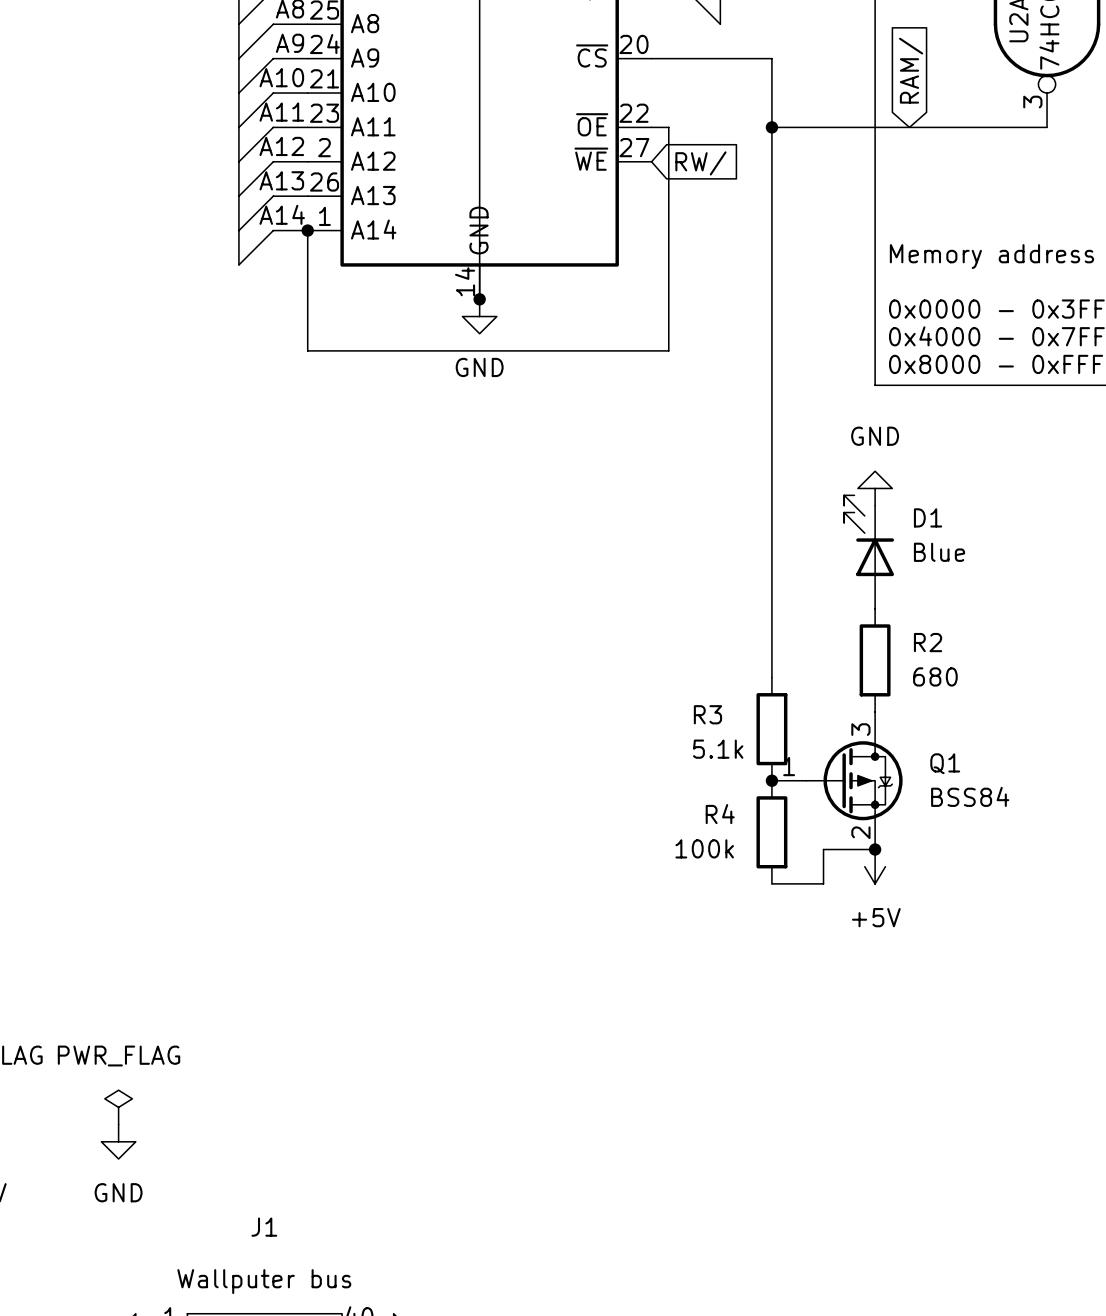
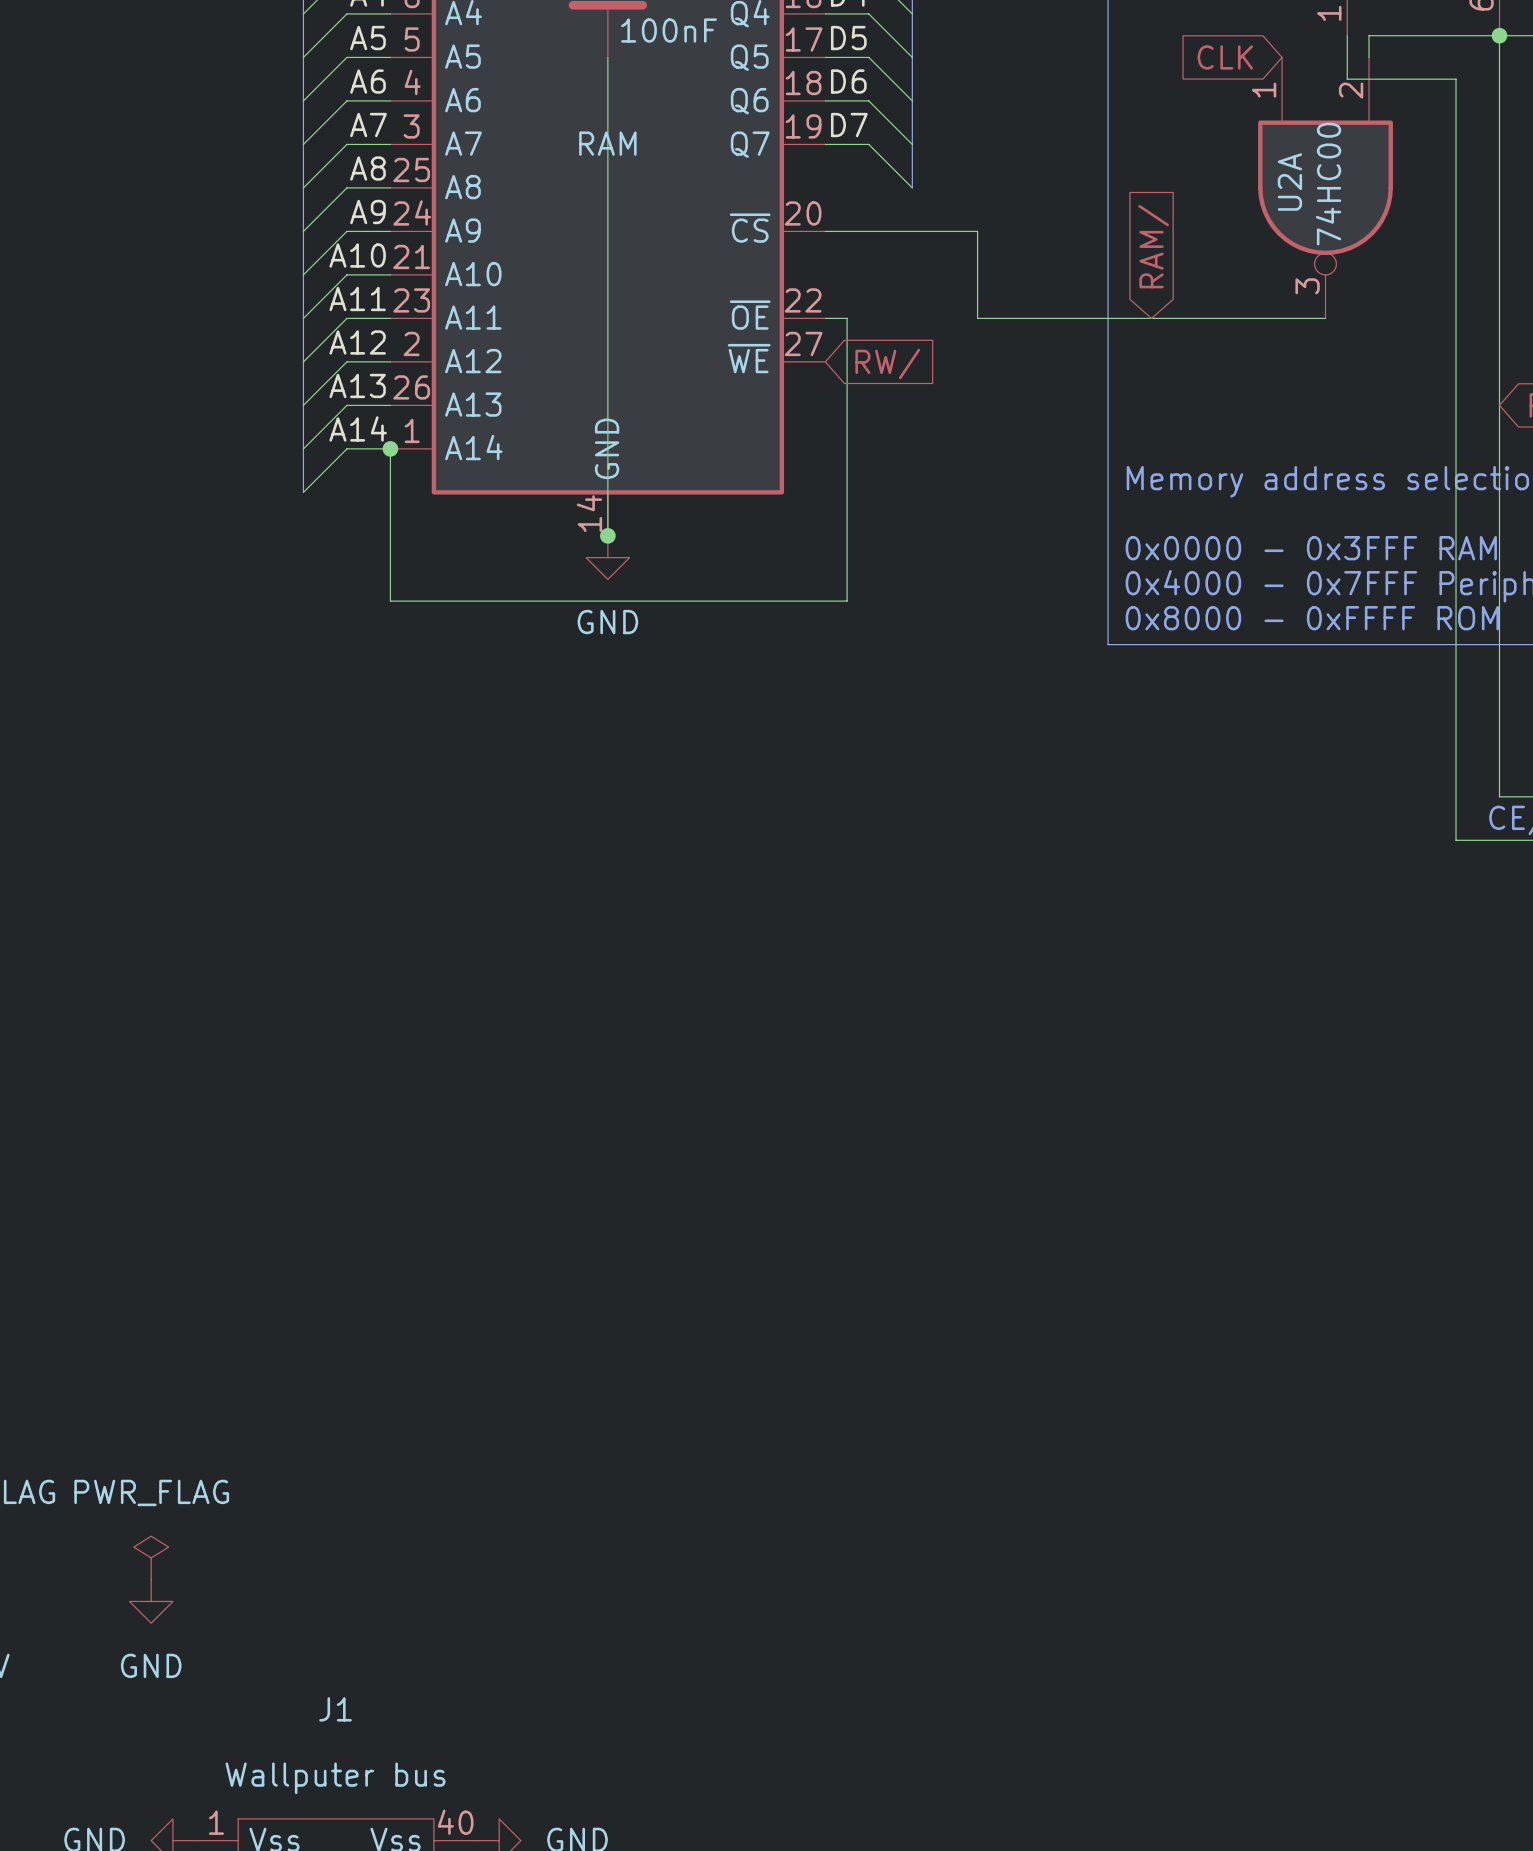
wire: (771, 127) (771, 677) -> none
junction: (771, 127) -> none
power symbol: GND (875, 488) -> none
D1: Blue (869, 552) -> none
R2: 680 (875, 660) -> none
R3: 5.1k (771, 729) -> none
junction: (771, 780) -> none
Q1: BSS84 (837, 780) -> none
R4: 100k (771, 832) -> none
wire: (875, 849) (823, 849) (823, 883) (771, 883) -> none
junction: (875, 849) -> none
power symbol: +5V (875, 866) -> none

